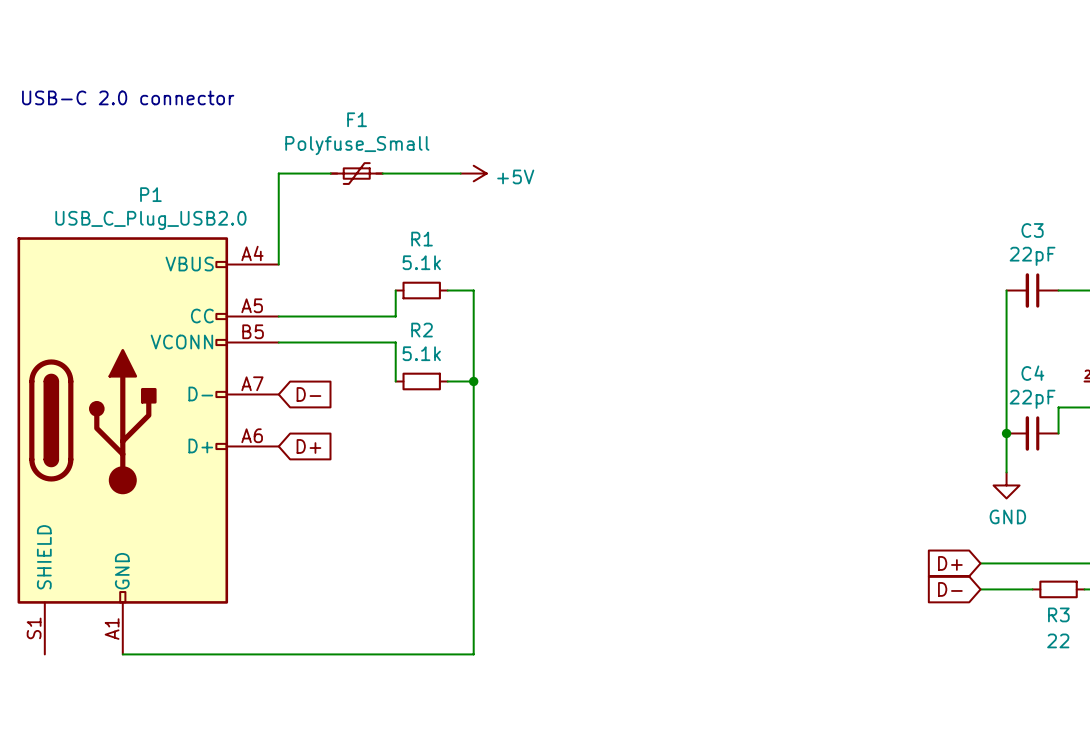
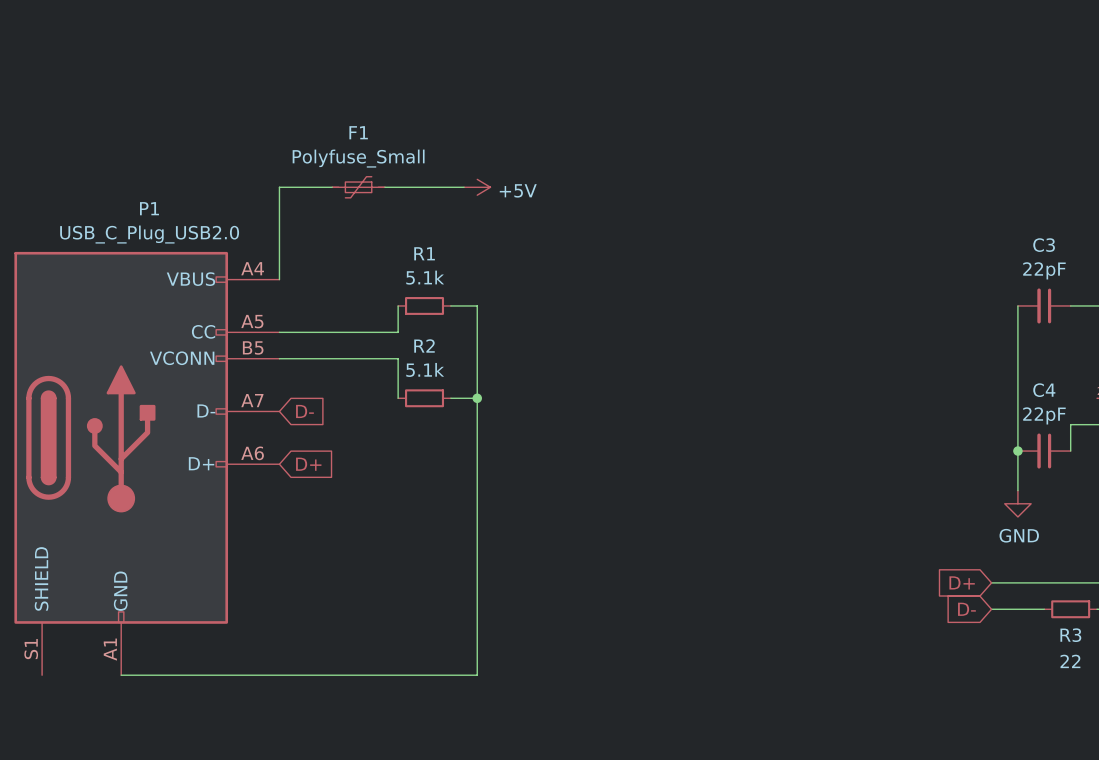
text: USB-C 2.0 connector (128, 97) -> none

